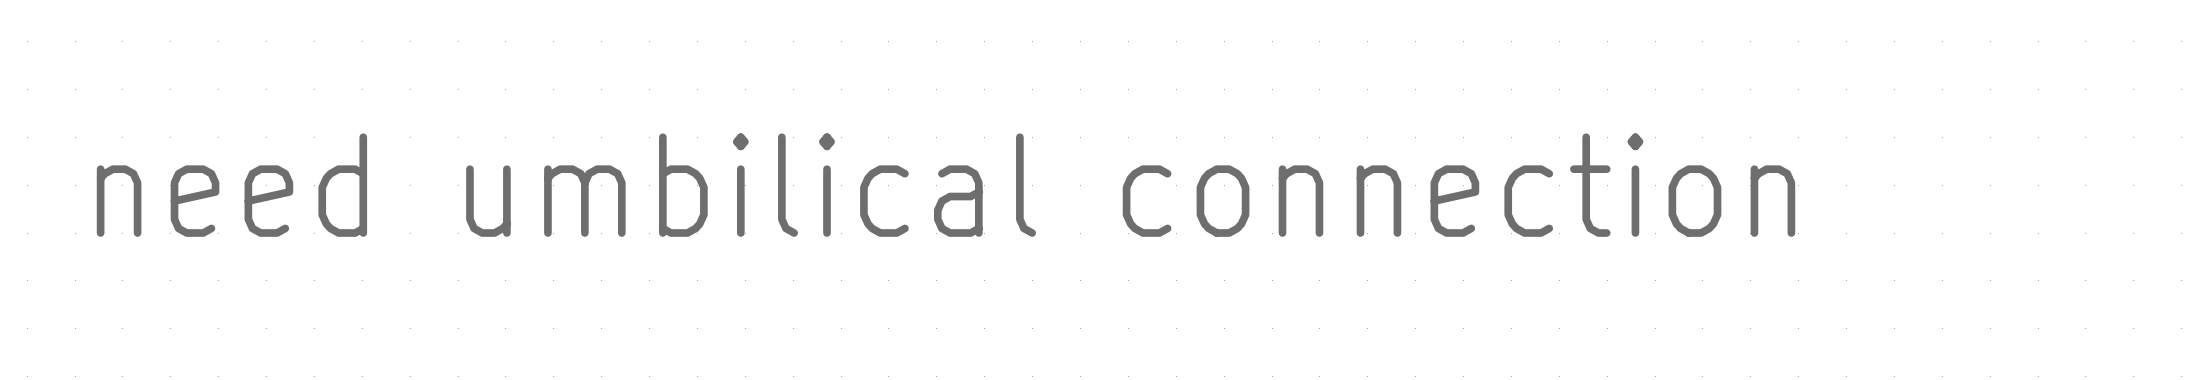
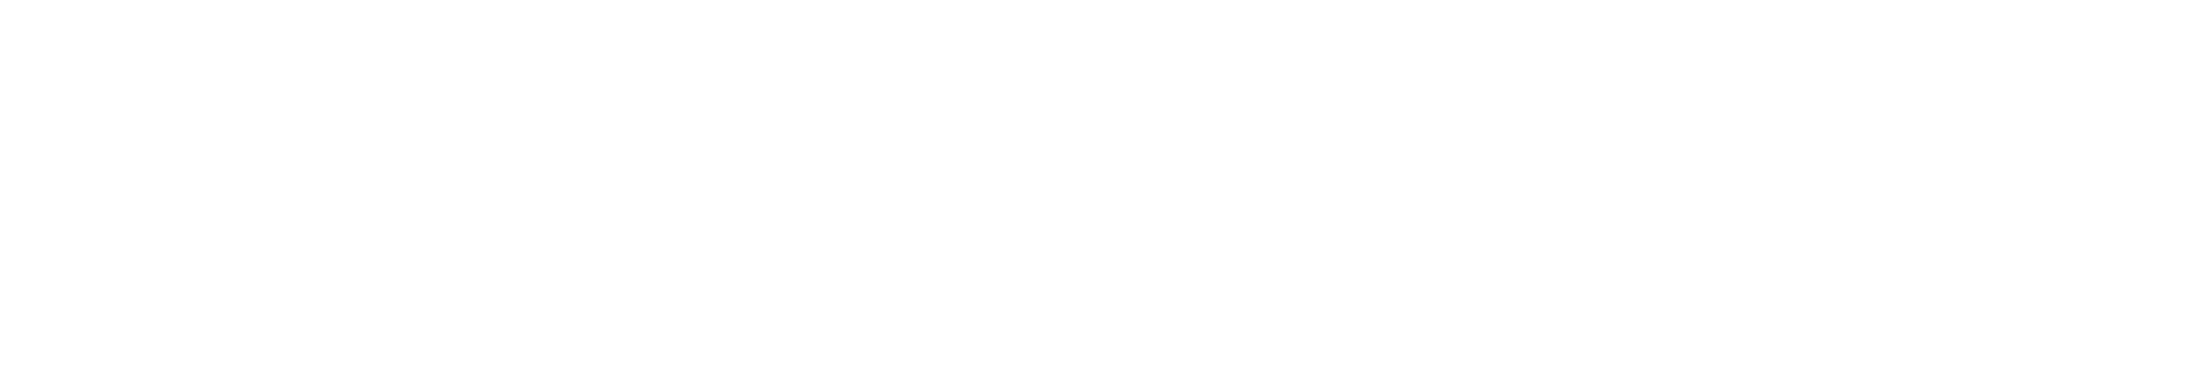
text: need umbilical connection (946, 185) -> none

